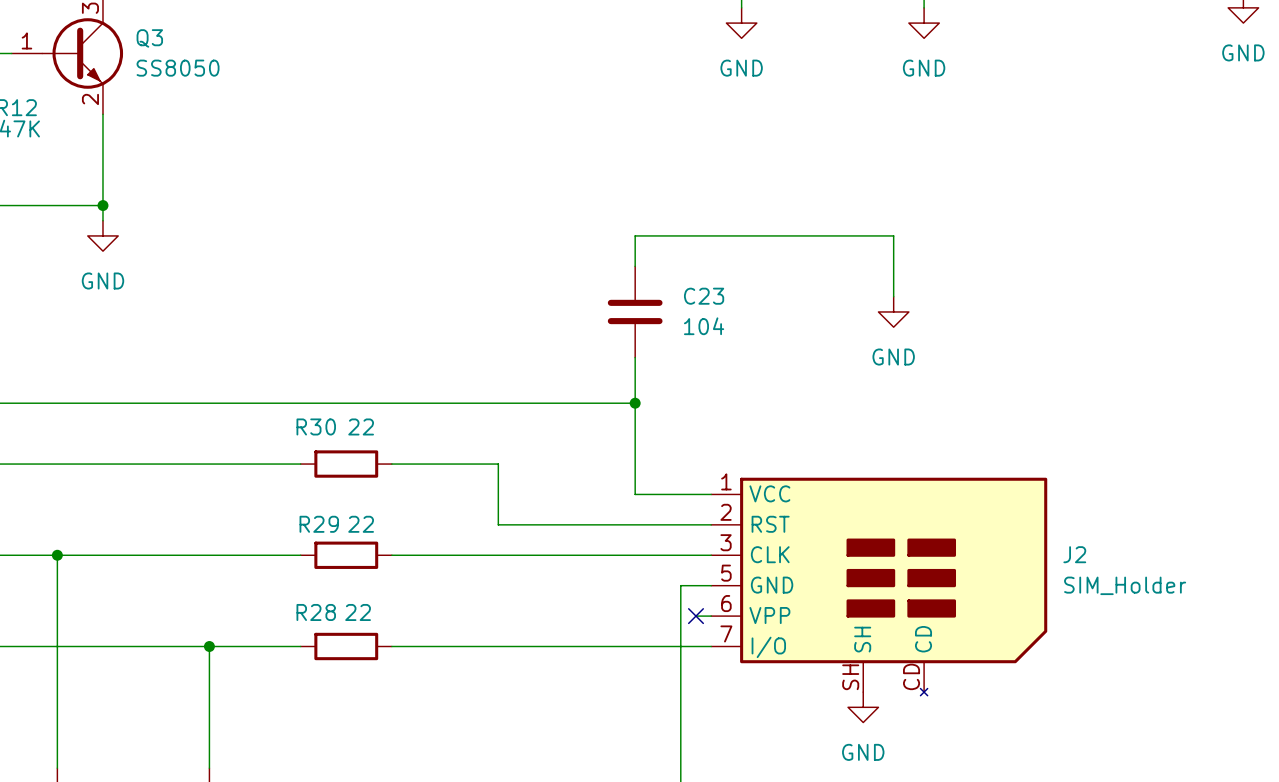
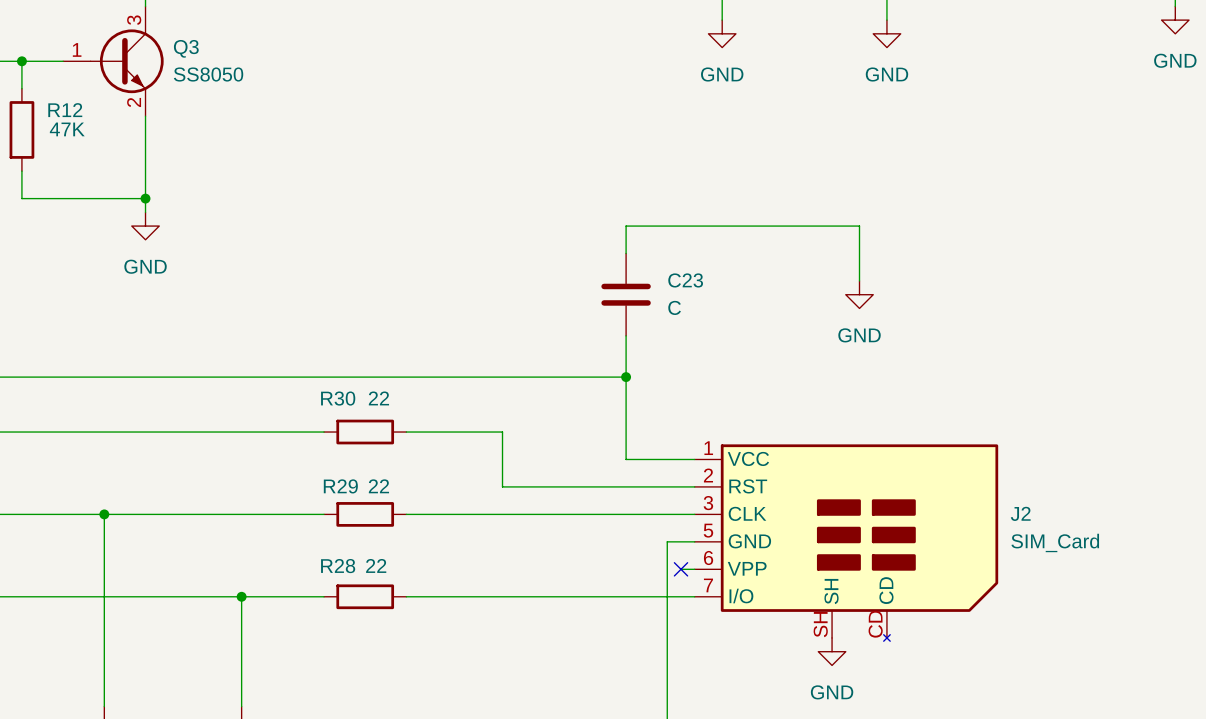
C23 value: 104 (704, 326) -> C (674, 307)
J2 value: SIM_Holder (1125, 585) -> SIM_Card (1055, 542)

